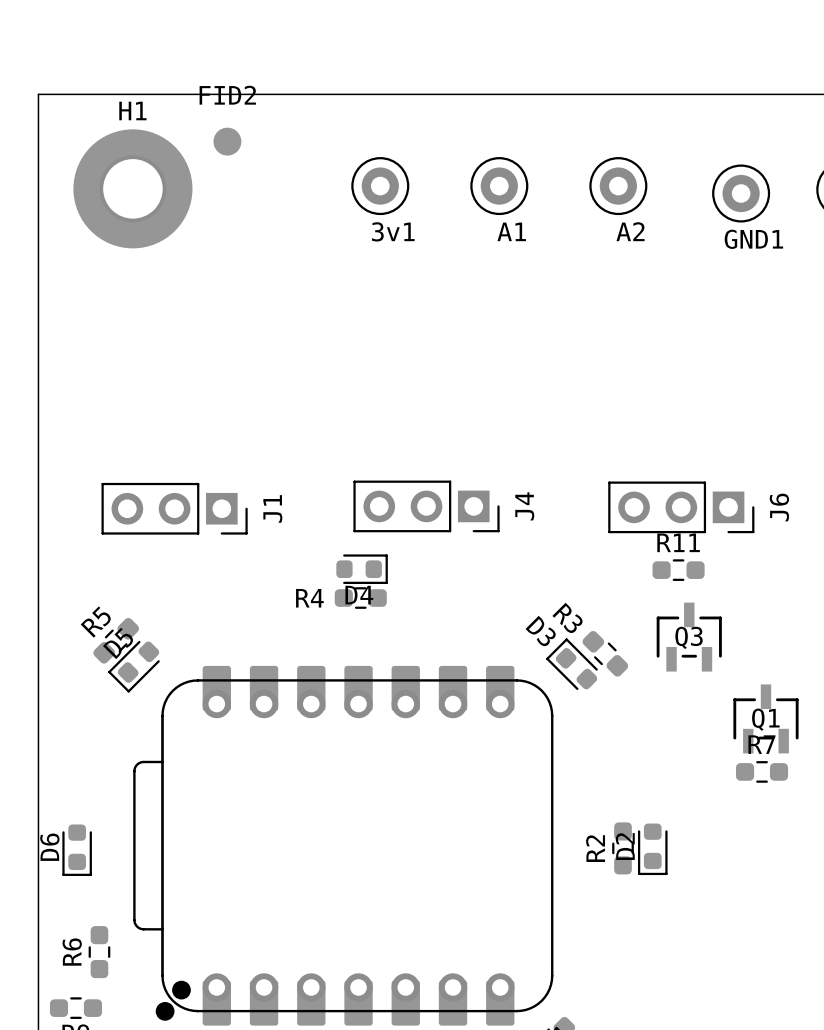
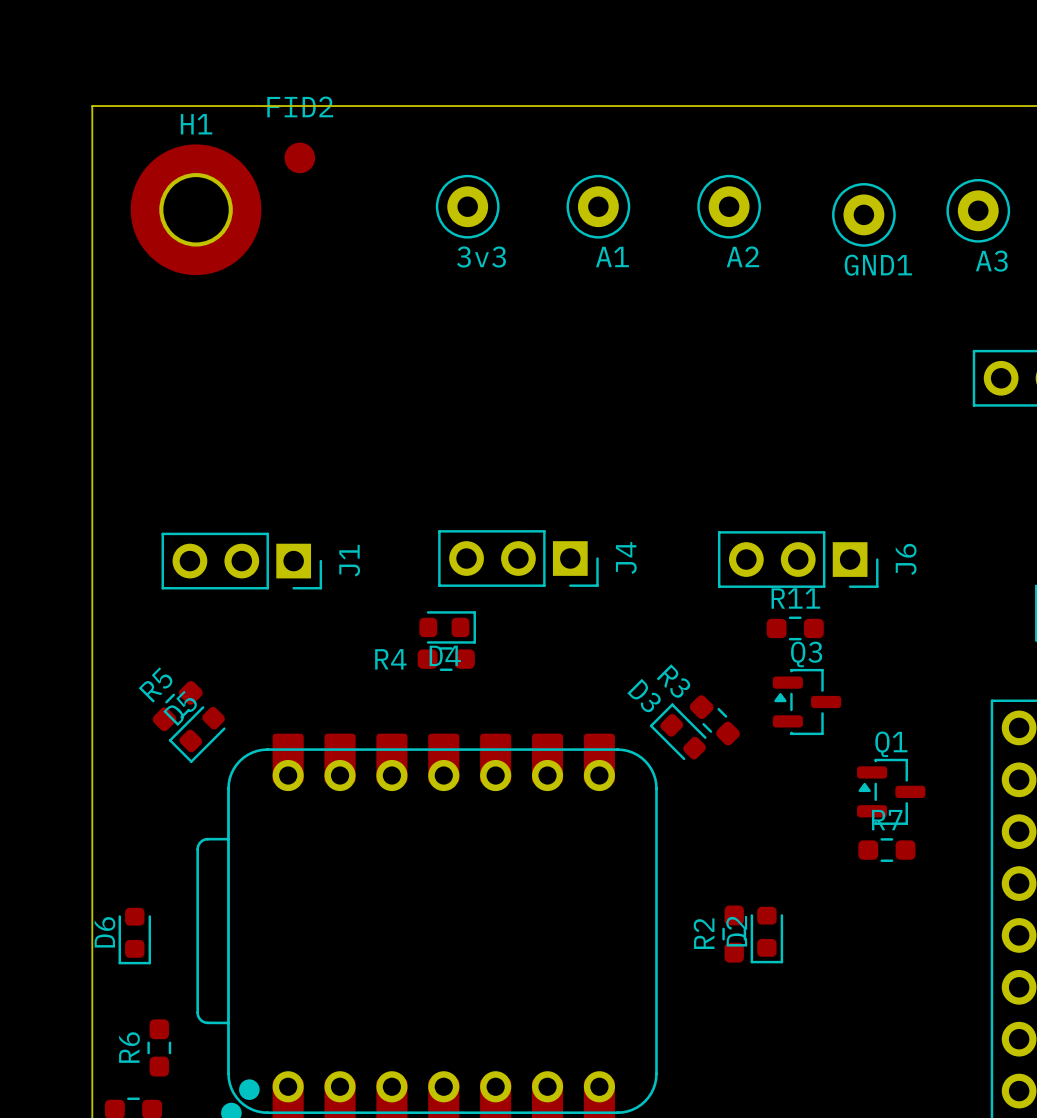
3v1 name: 3v1 (393, 231) -> 3v3 (481, 257)
Q3 footprint: [656, 602, 722, 672] -> [772, 668, 842, 736]
Q3 name position: Q3 (689, 637) -> Q3 (806, 654)
Q1 footprint: [733, 684, 799, 754] -> [857, 758, 926, 825]
Q1 name position: Q1 (765, 719) -> Q1 (891, 744)

